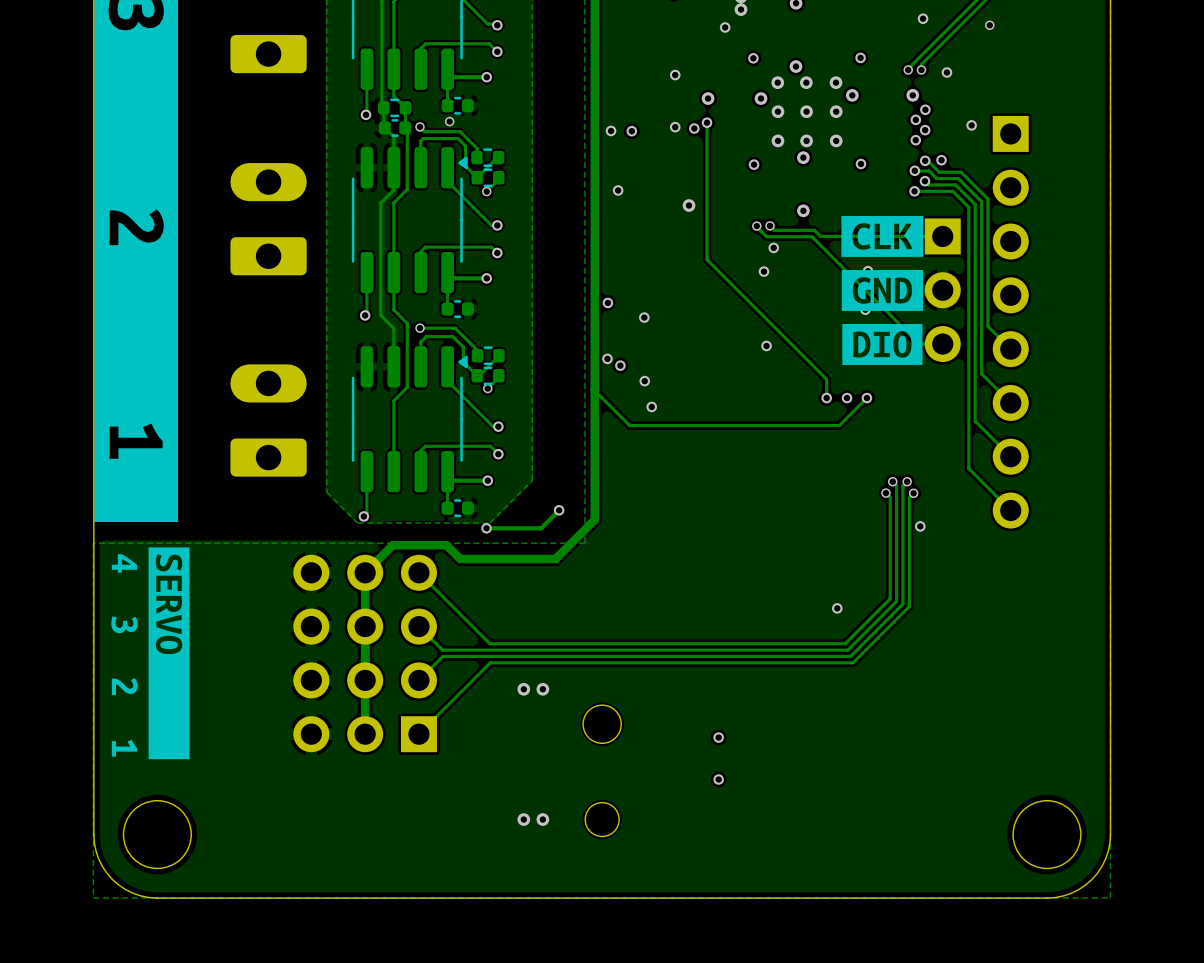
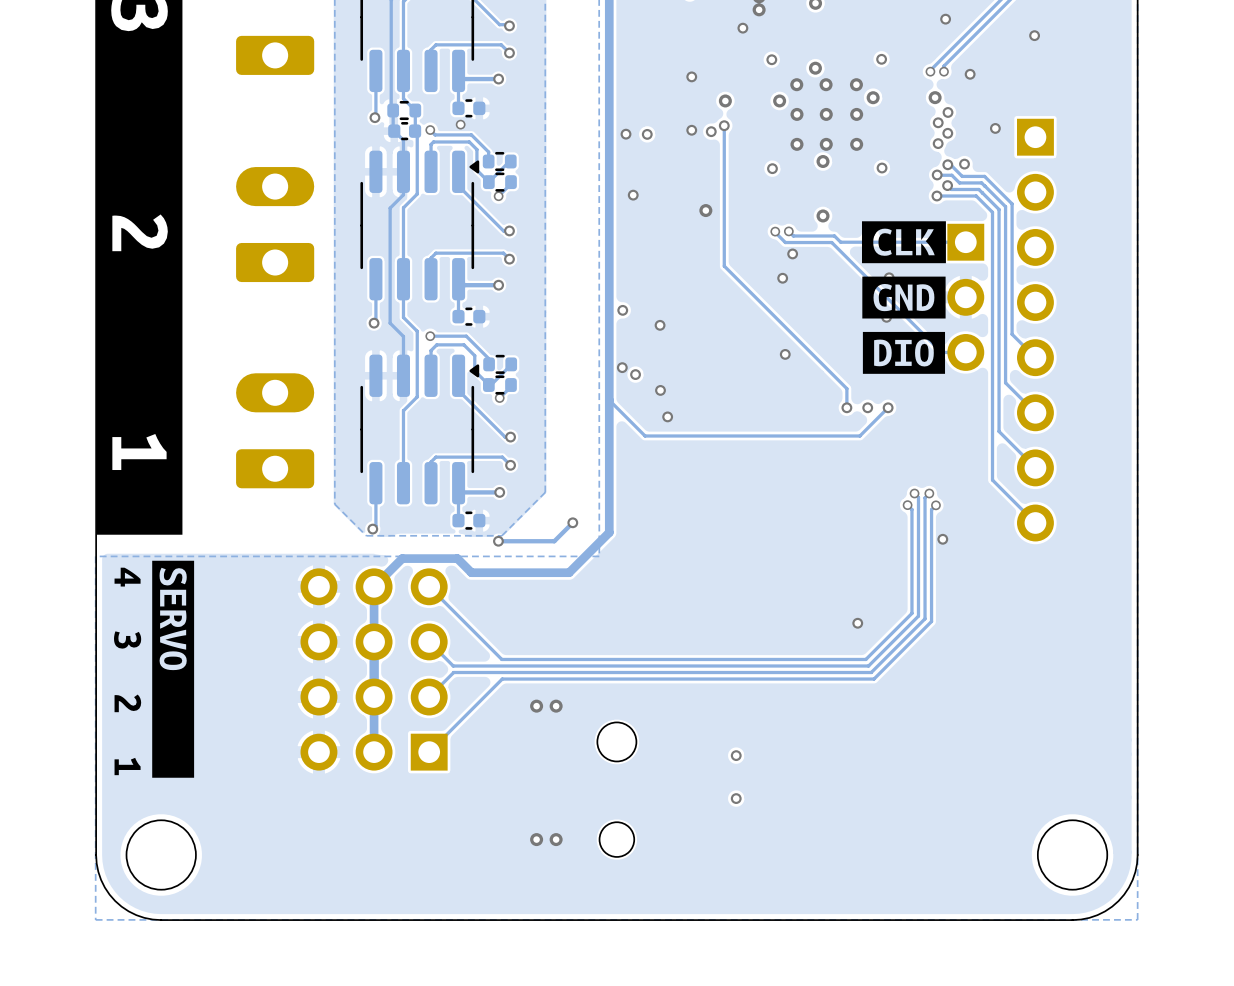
via: (989, 25) -> none
via: none -> (1034, 35)

